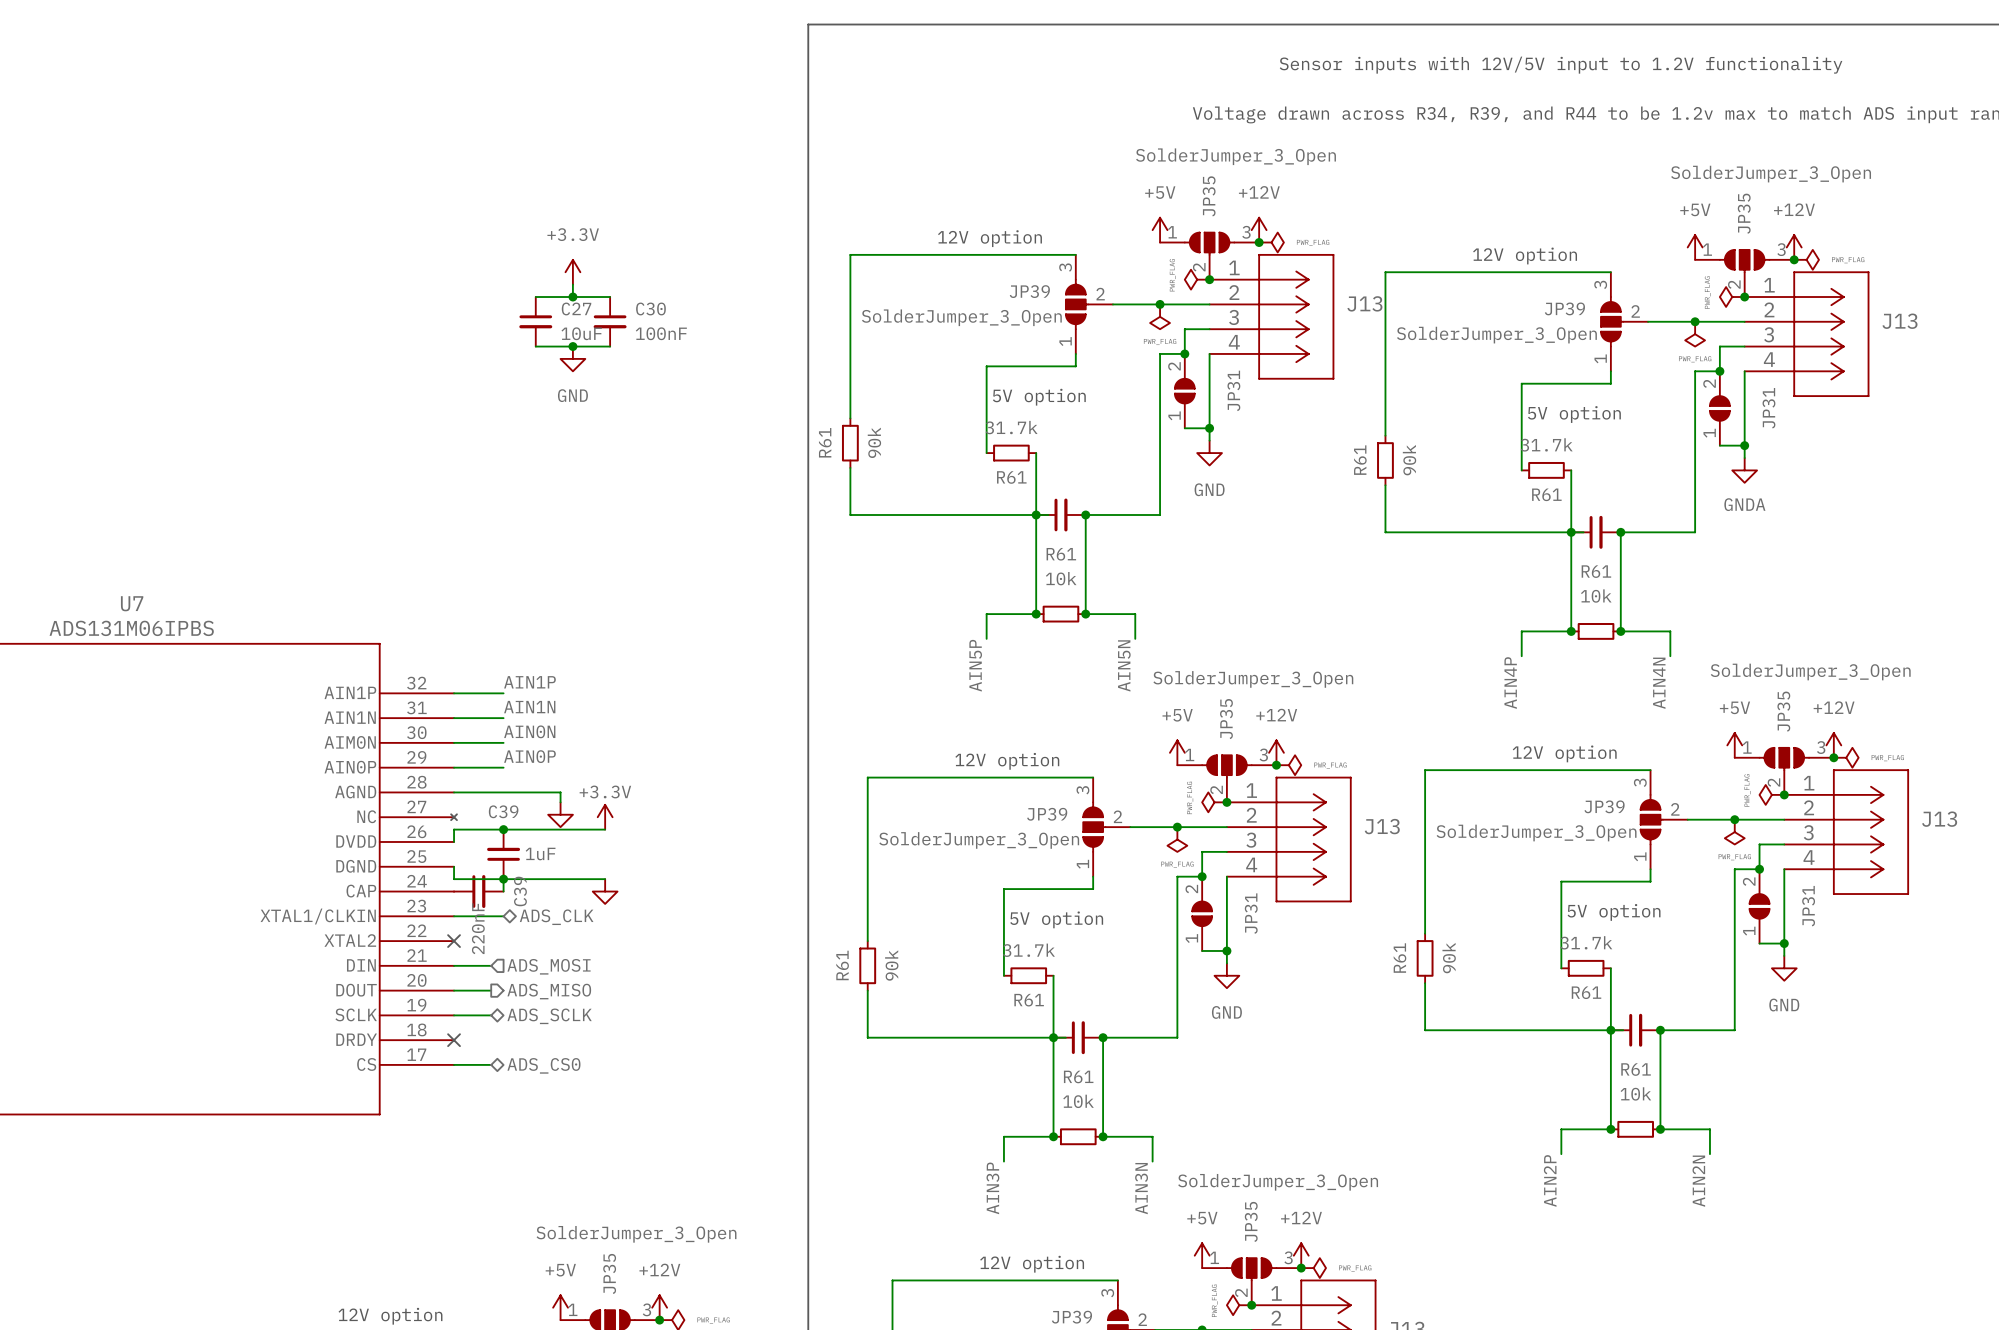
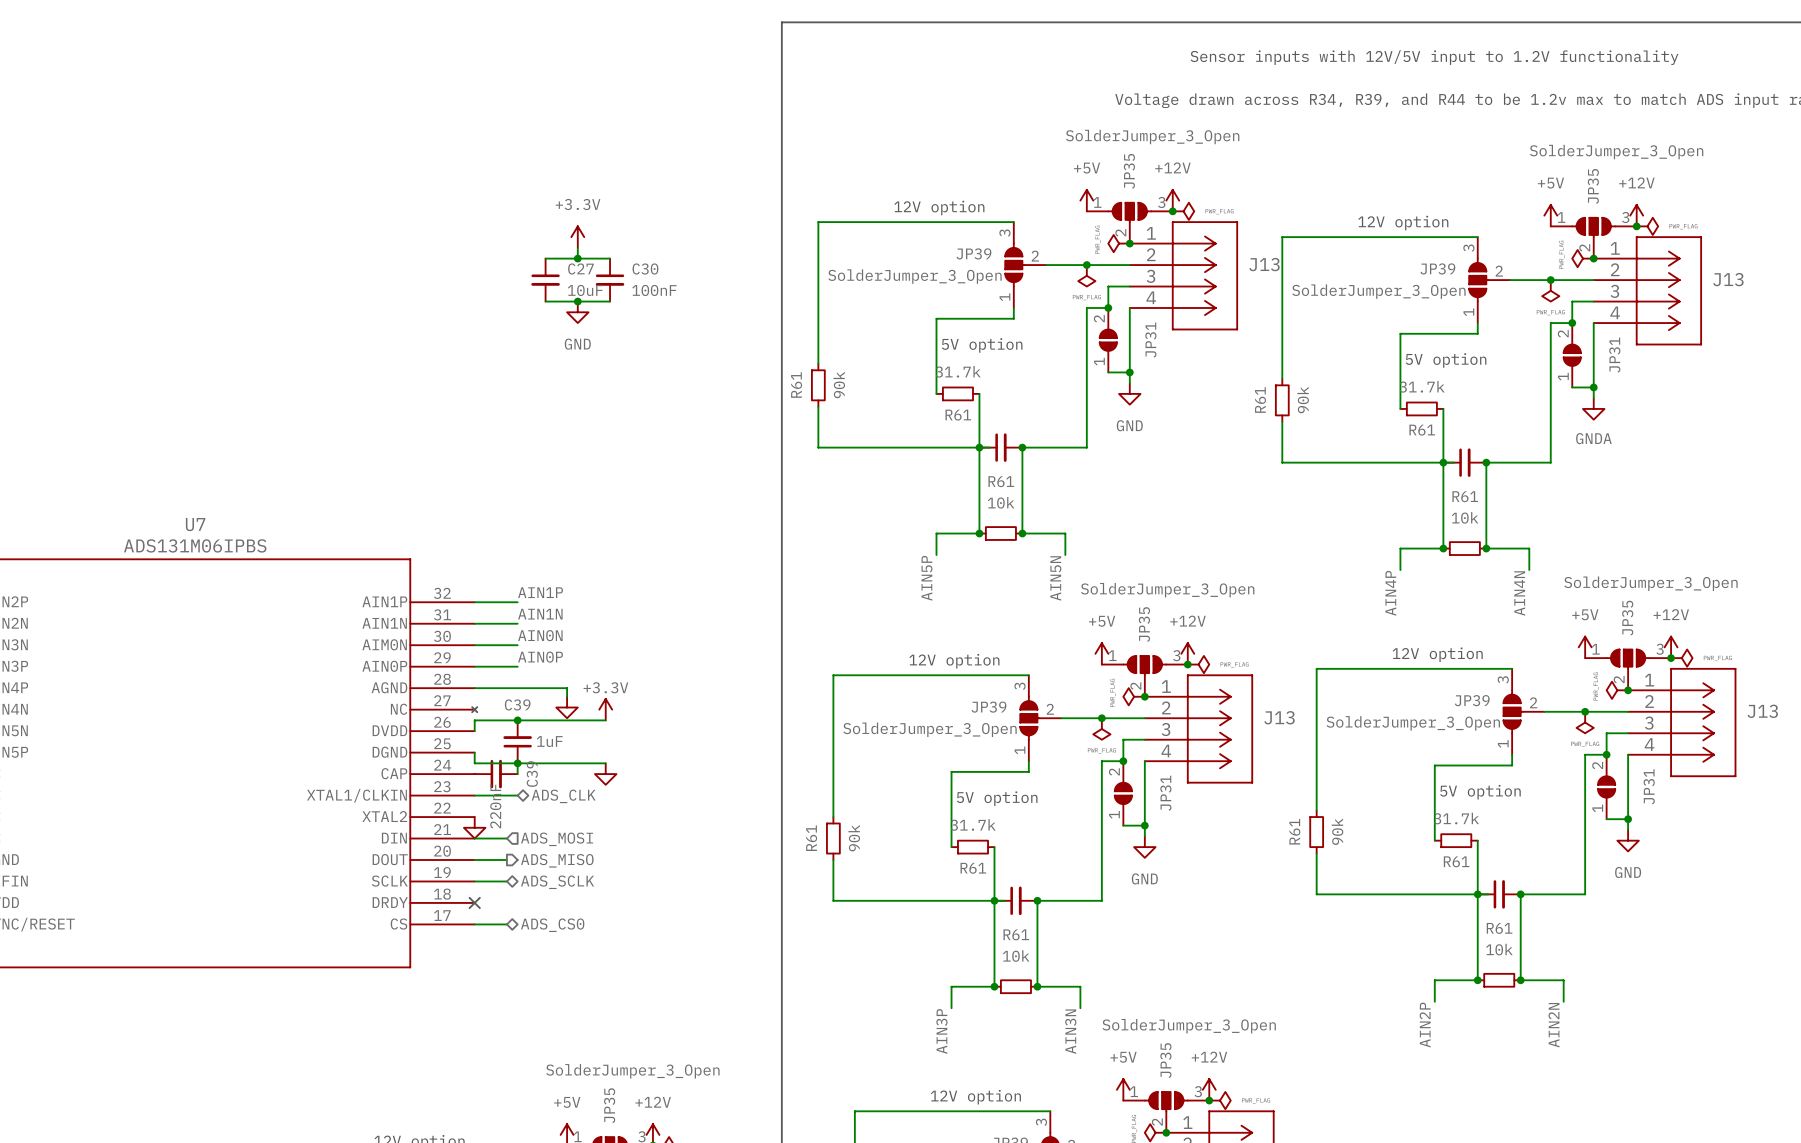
no-connect mark: (454, 941) -> none
power symbol: none -> (474, 827)

